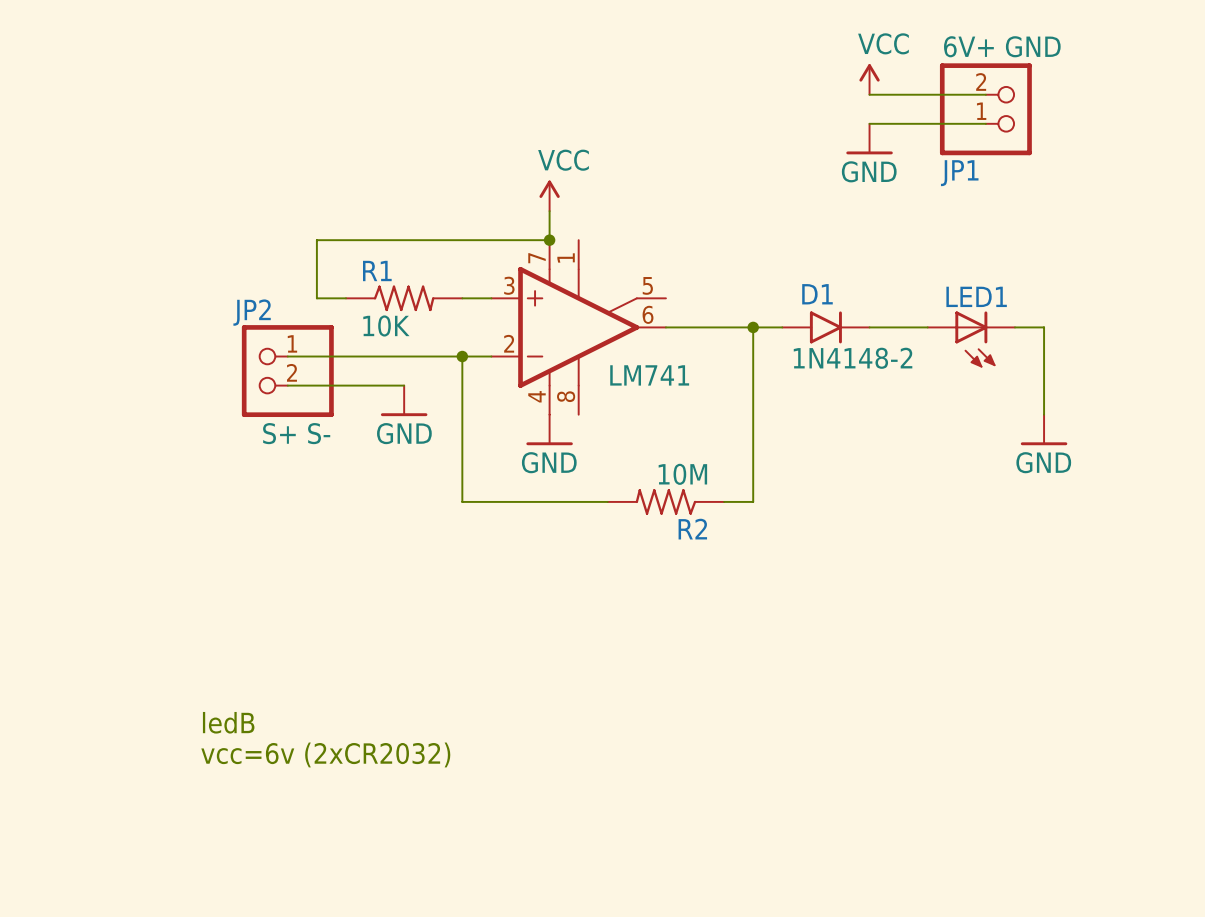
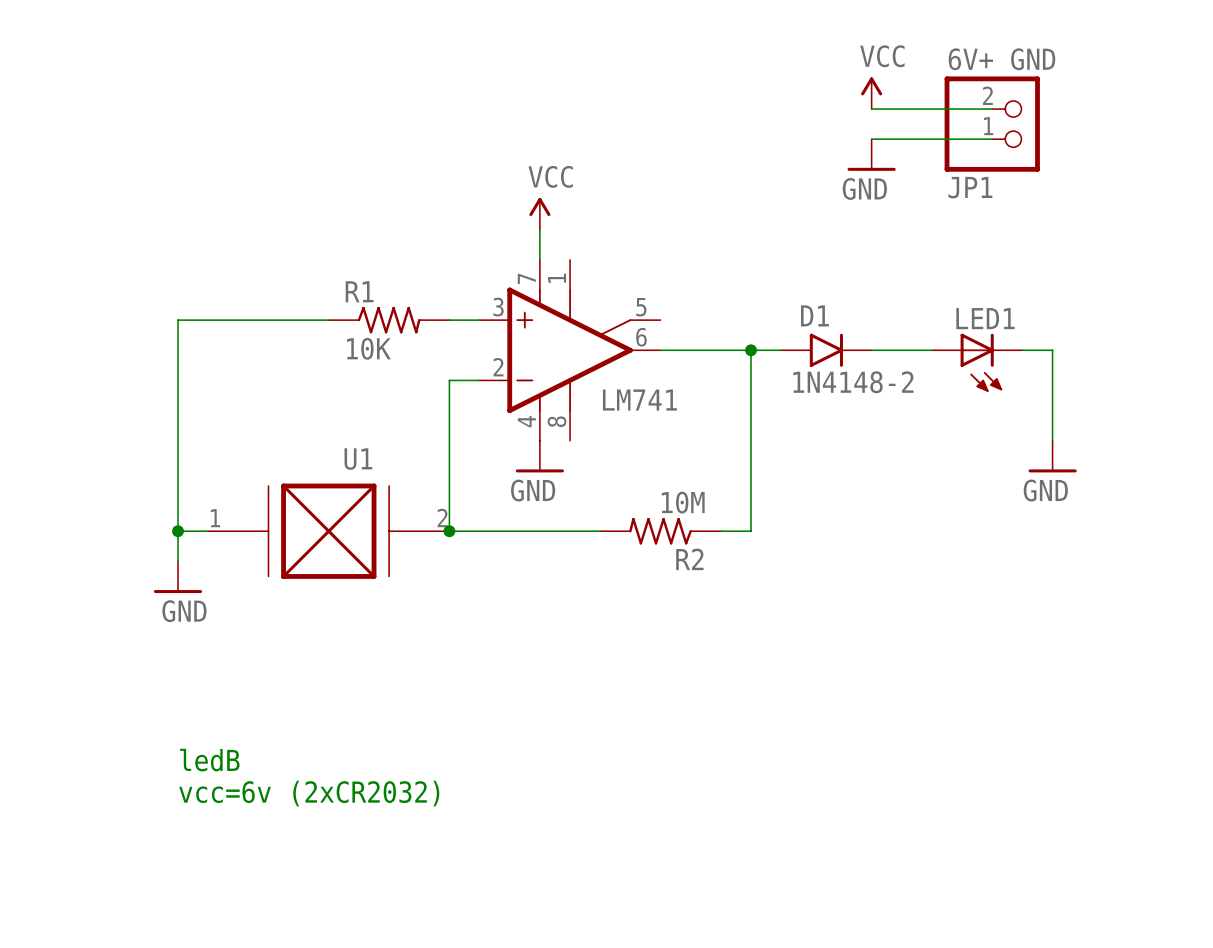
wire: (549, 240) (316, 240) (316, 298) -> (178, 561) (178, 320) (298, 320)
junction: (549, 240) -> none
wire: (287, 356) (462, 356) -> none
junction: (462, 356) -> none
JP2: S+ S- (287, 371) -> none
wire: (287, 385) (404, 385) -> none
power symbol position: GND (404, 400) -> GND (178, 577)
wire: none -> (178, 531) (208, 531)
junction: none -> (178, 531)
U1: none -> (328, 531)
junction: none -> (449, 531)

